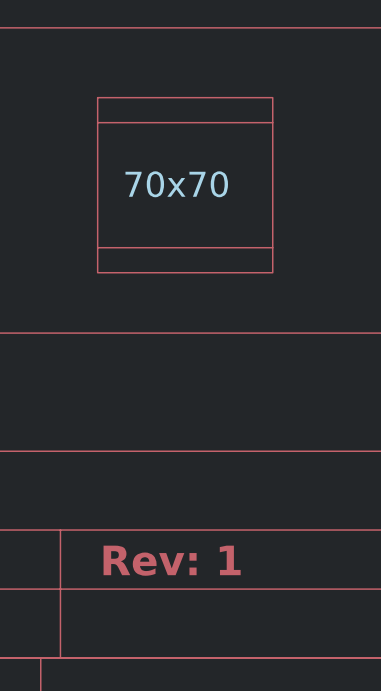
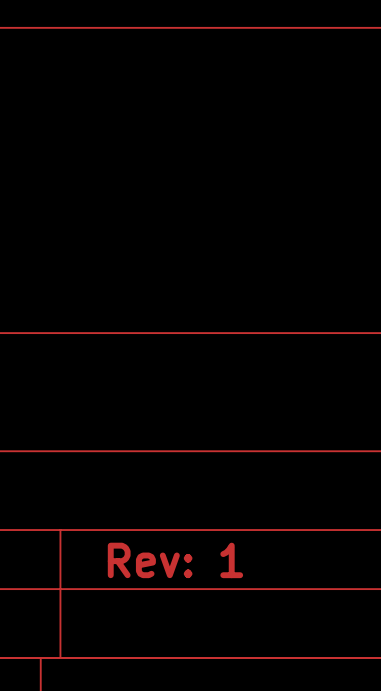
part: (185, 122) -> none
part: 70x70 (185, 185) -> none
part: (185, 247) -> none

